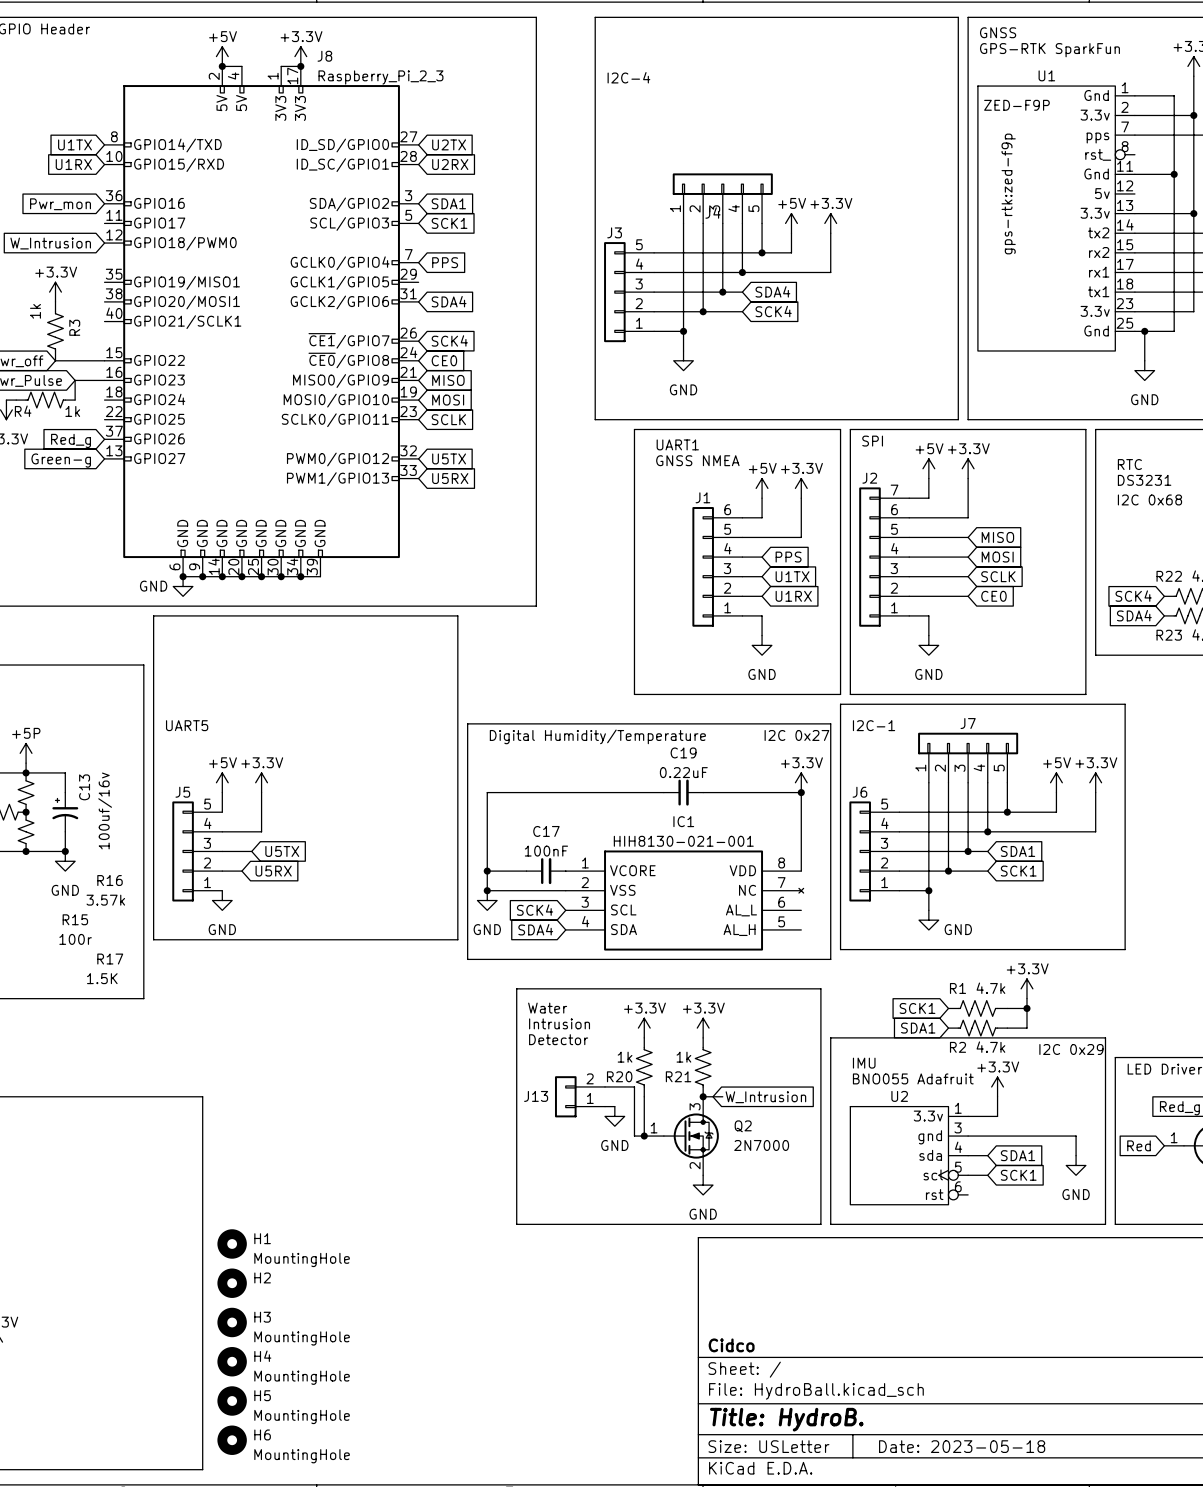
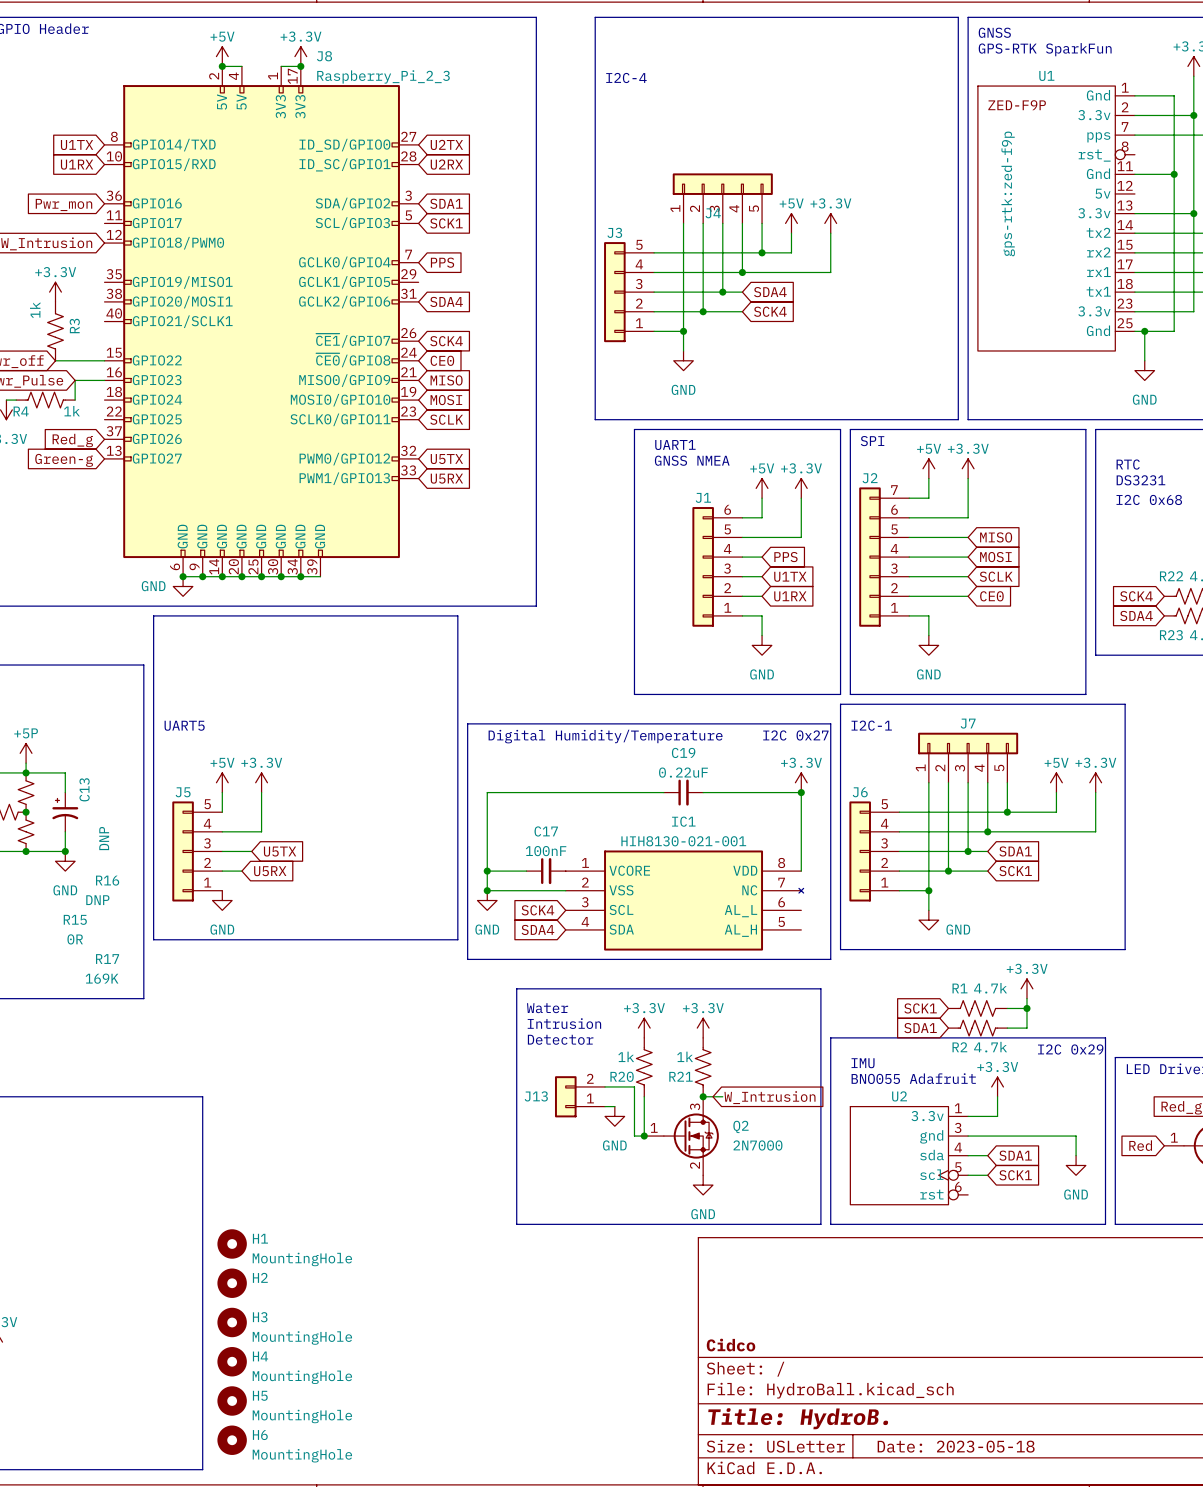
C13 value: 100uf/16v (105, 810) -> DNP (104, 838)
R16 value: 3.57k (105, 900) -> DNP (97, 900)
R15 value: 100r (75, 939) -> 0R (75, 939)
R17 value: 1.5K (102, 978) -> 169K (102, 978)

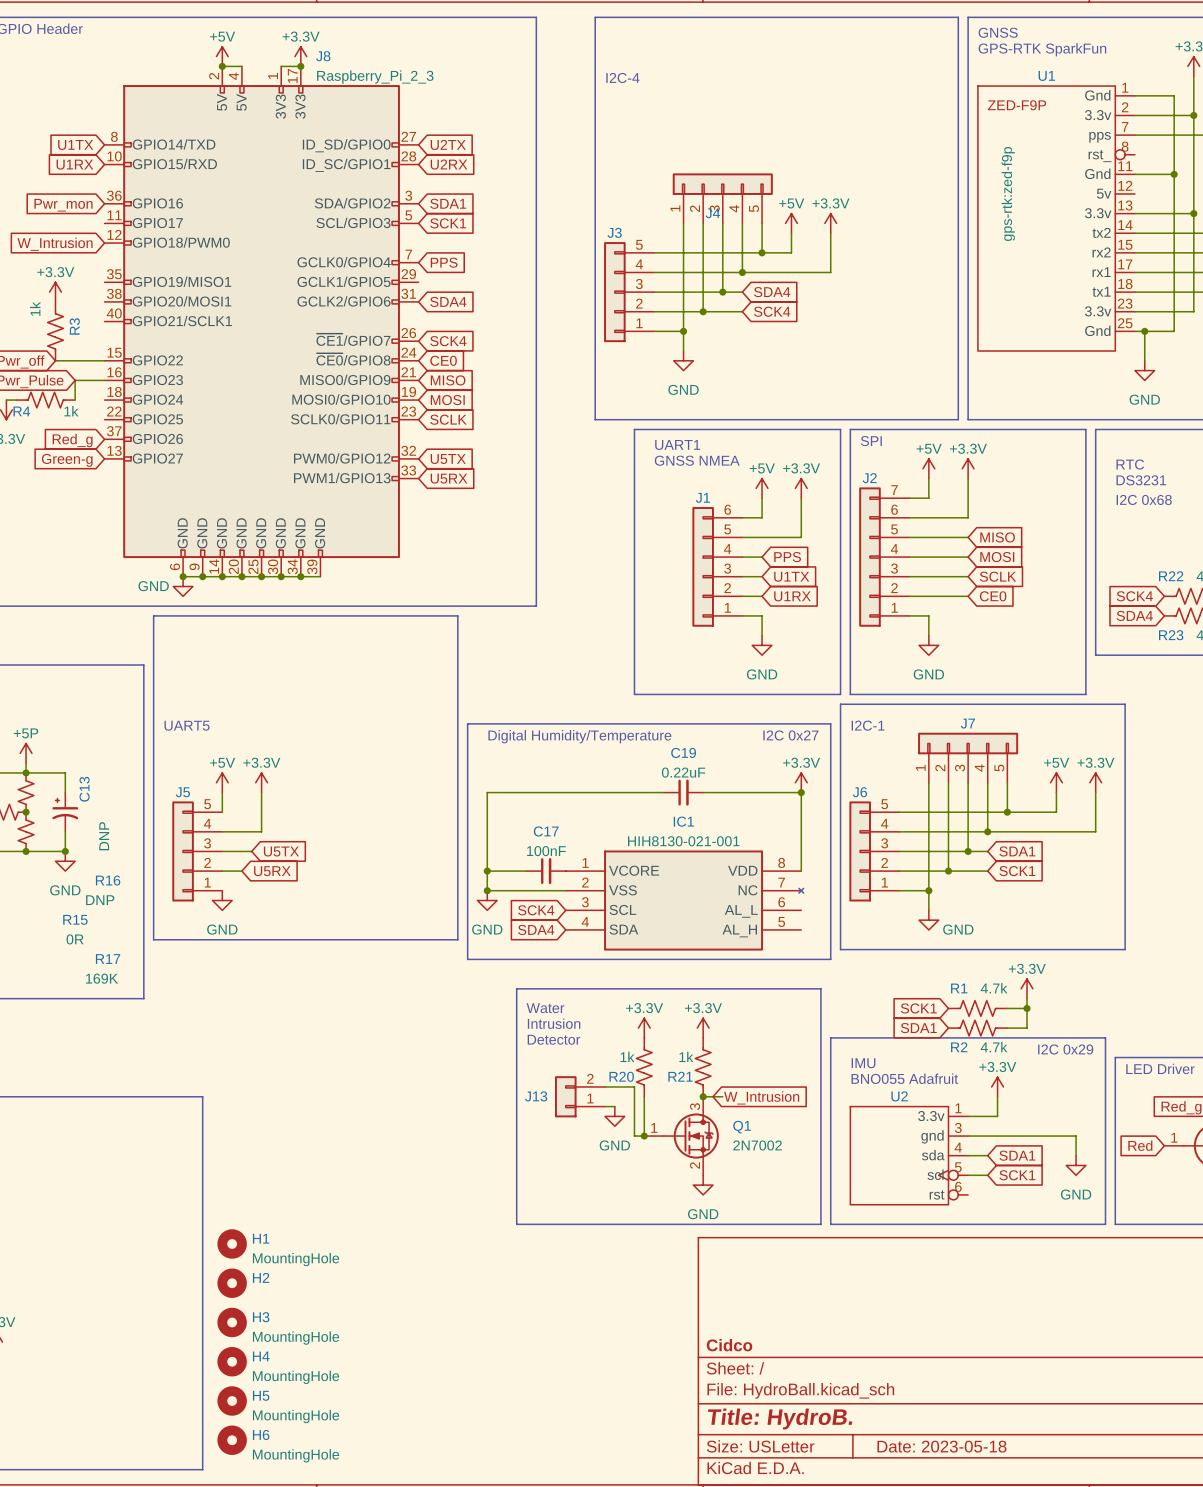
Q2 name: Q2 (740, 1126) -> Q1 (742, 1127)
Q2 value: 2N7000 (757, 1145) -> 2N7002 (757, 1145)

